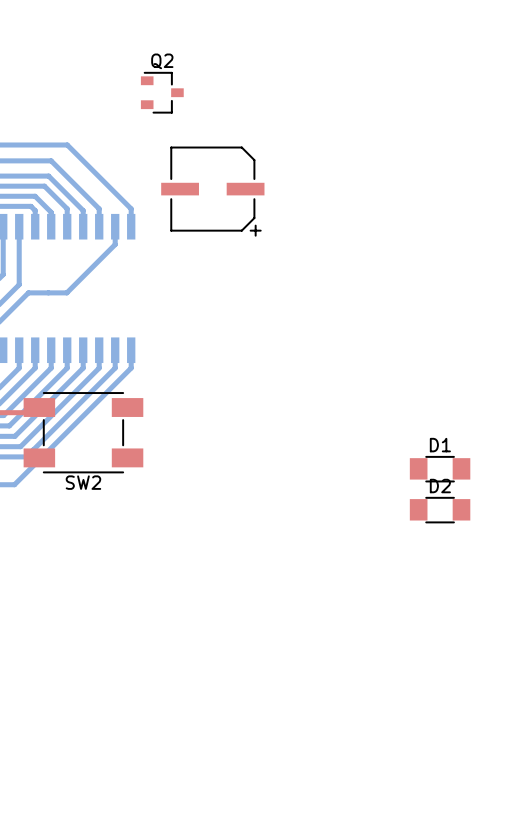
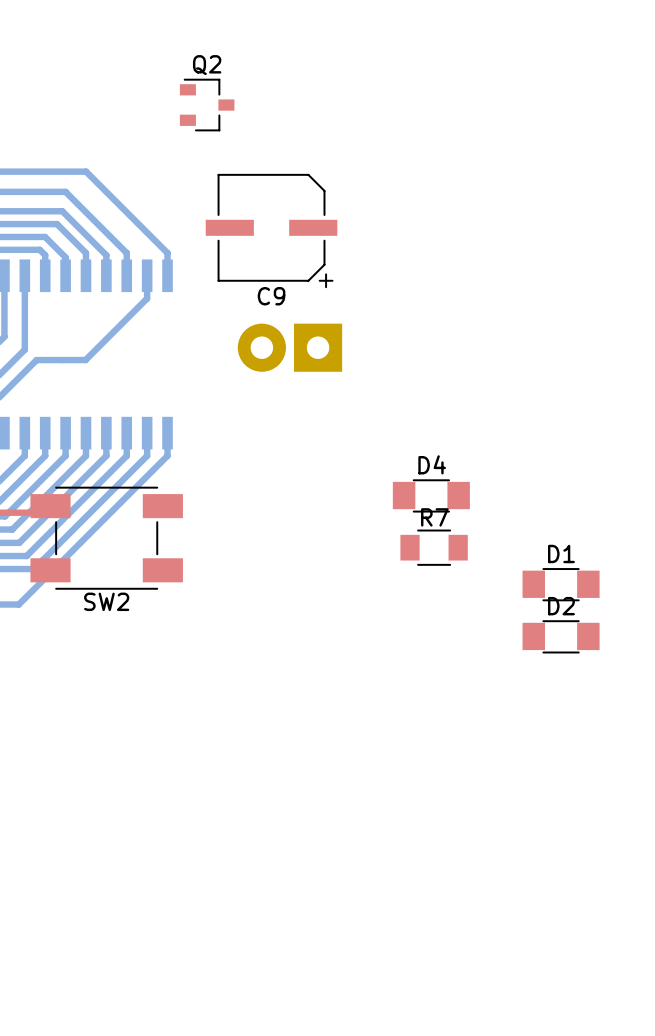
C9 name: none -> C9 (271, 296)
part: none -> (289, 347)
D4: none -> (431, 495)
R7: none -> (434, 547)

